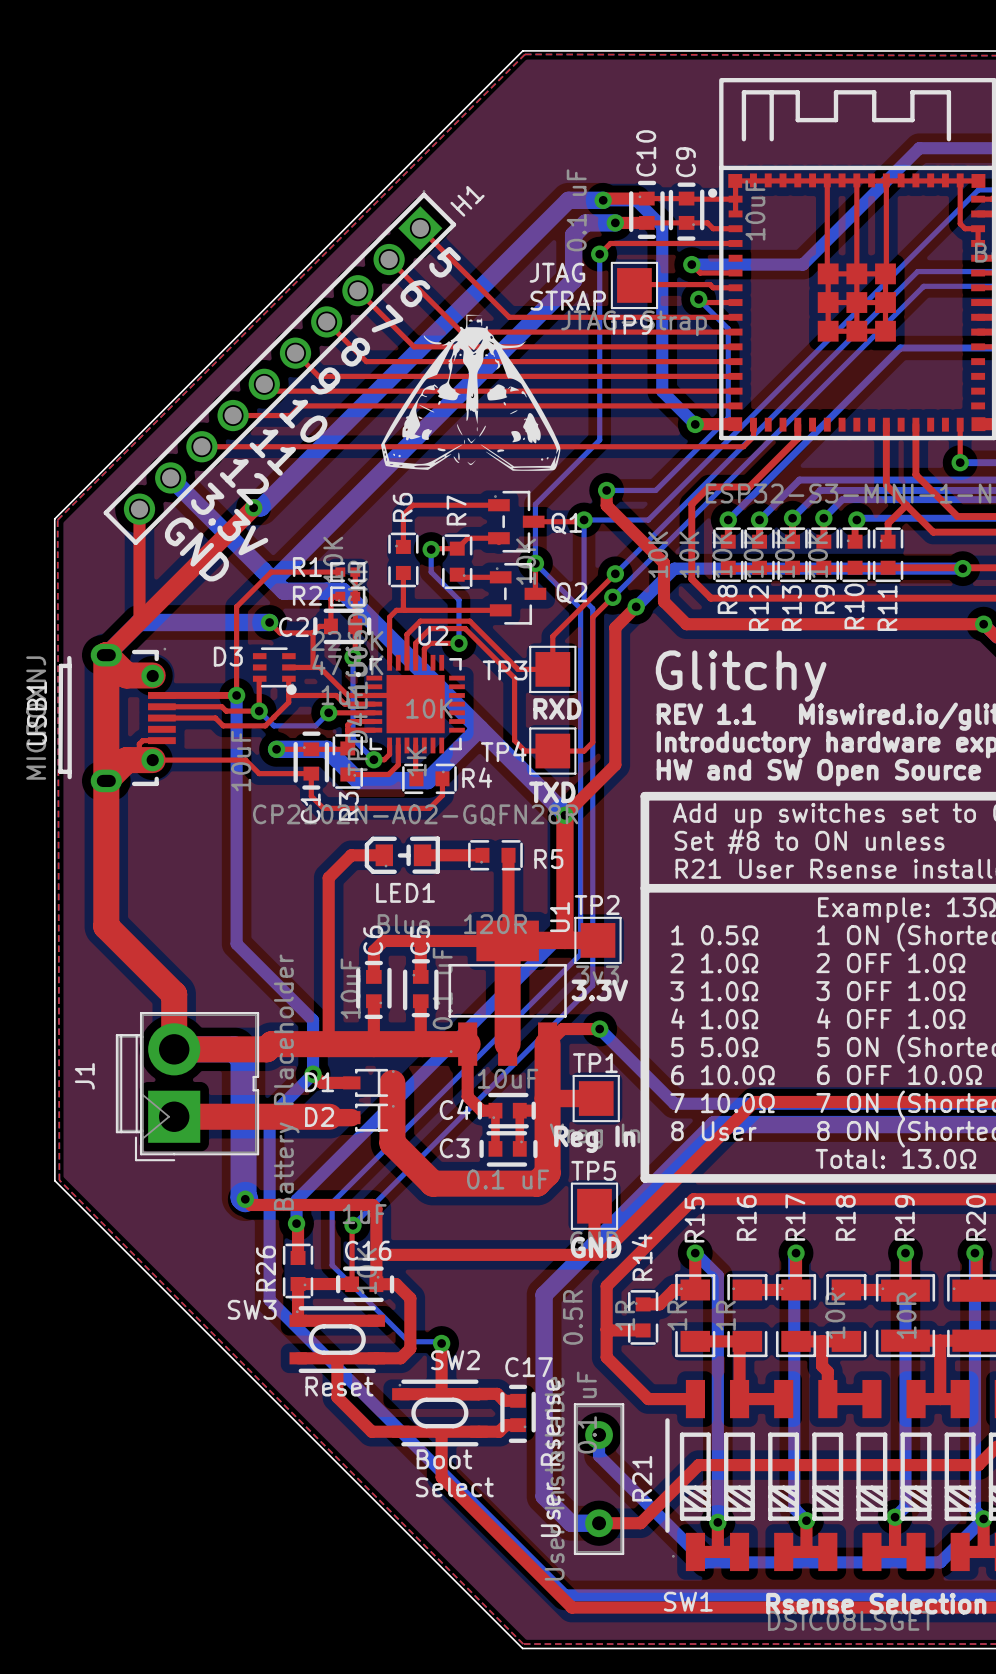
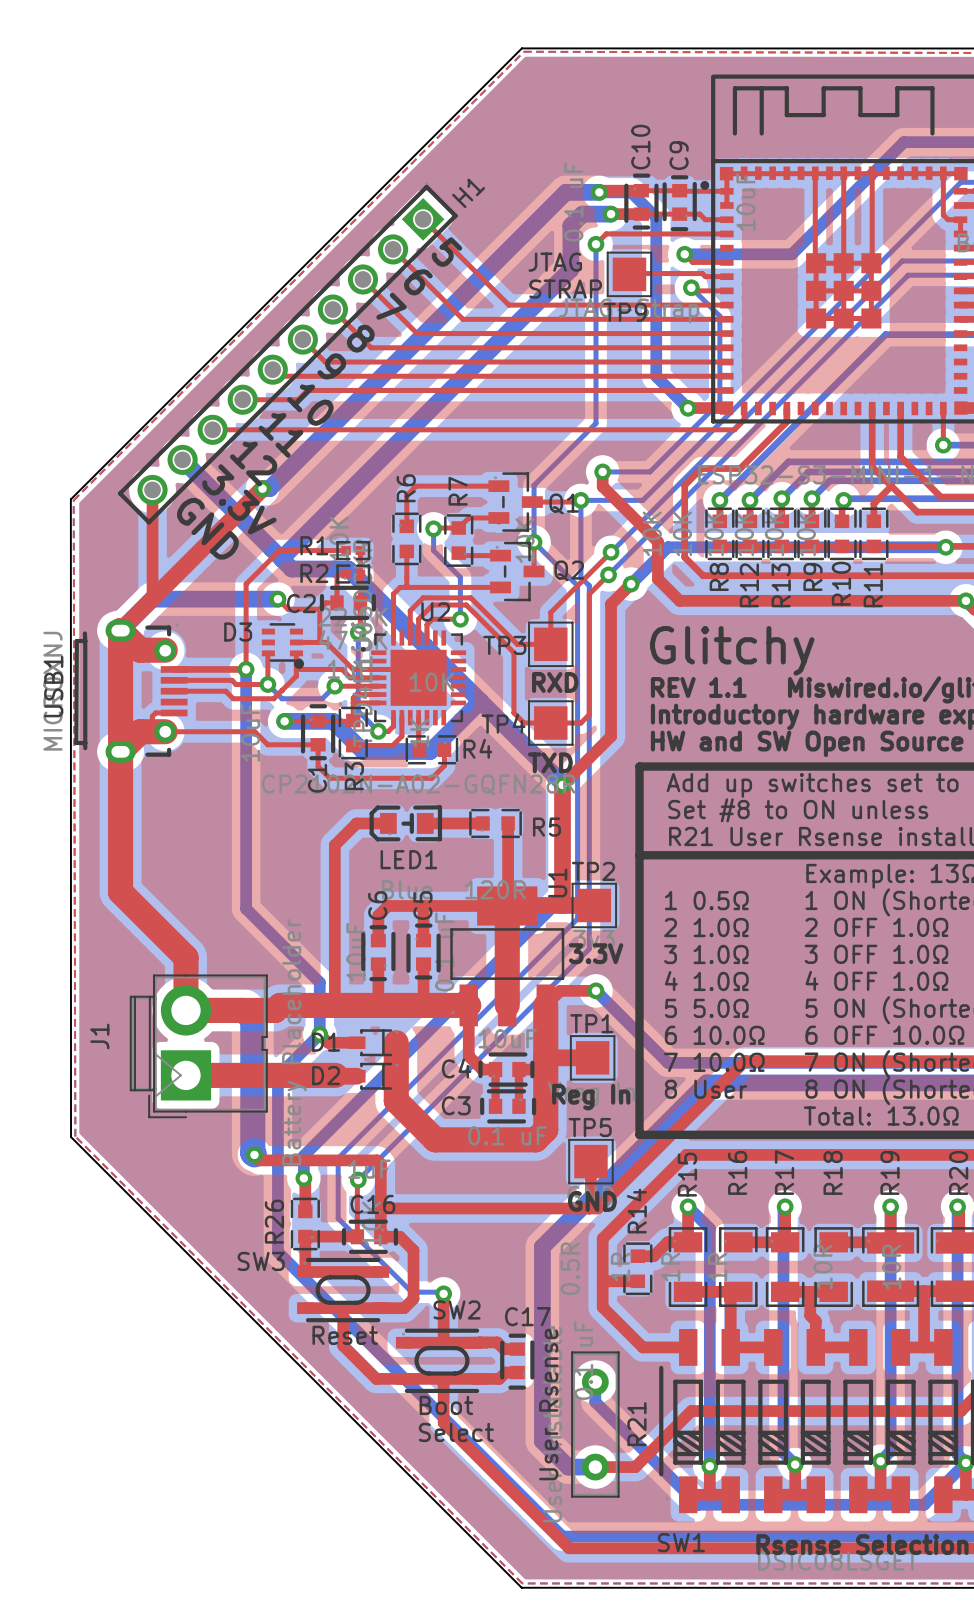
drawing: [381, 314, 561, 471] -> none

